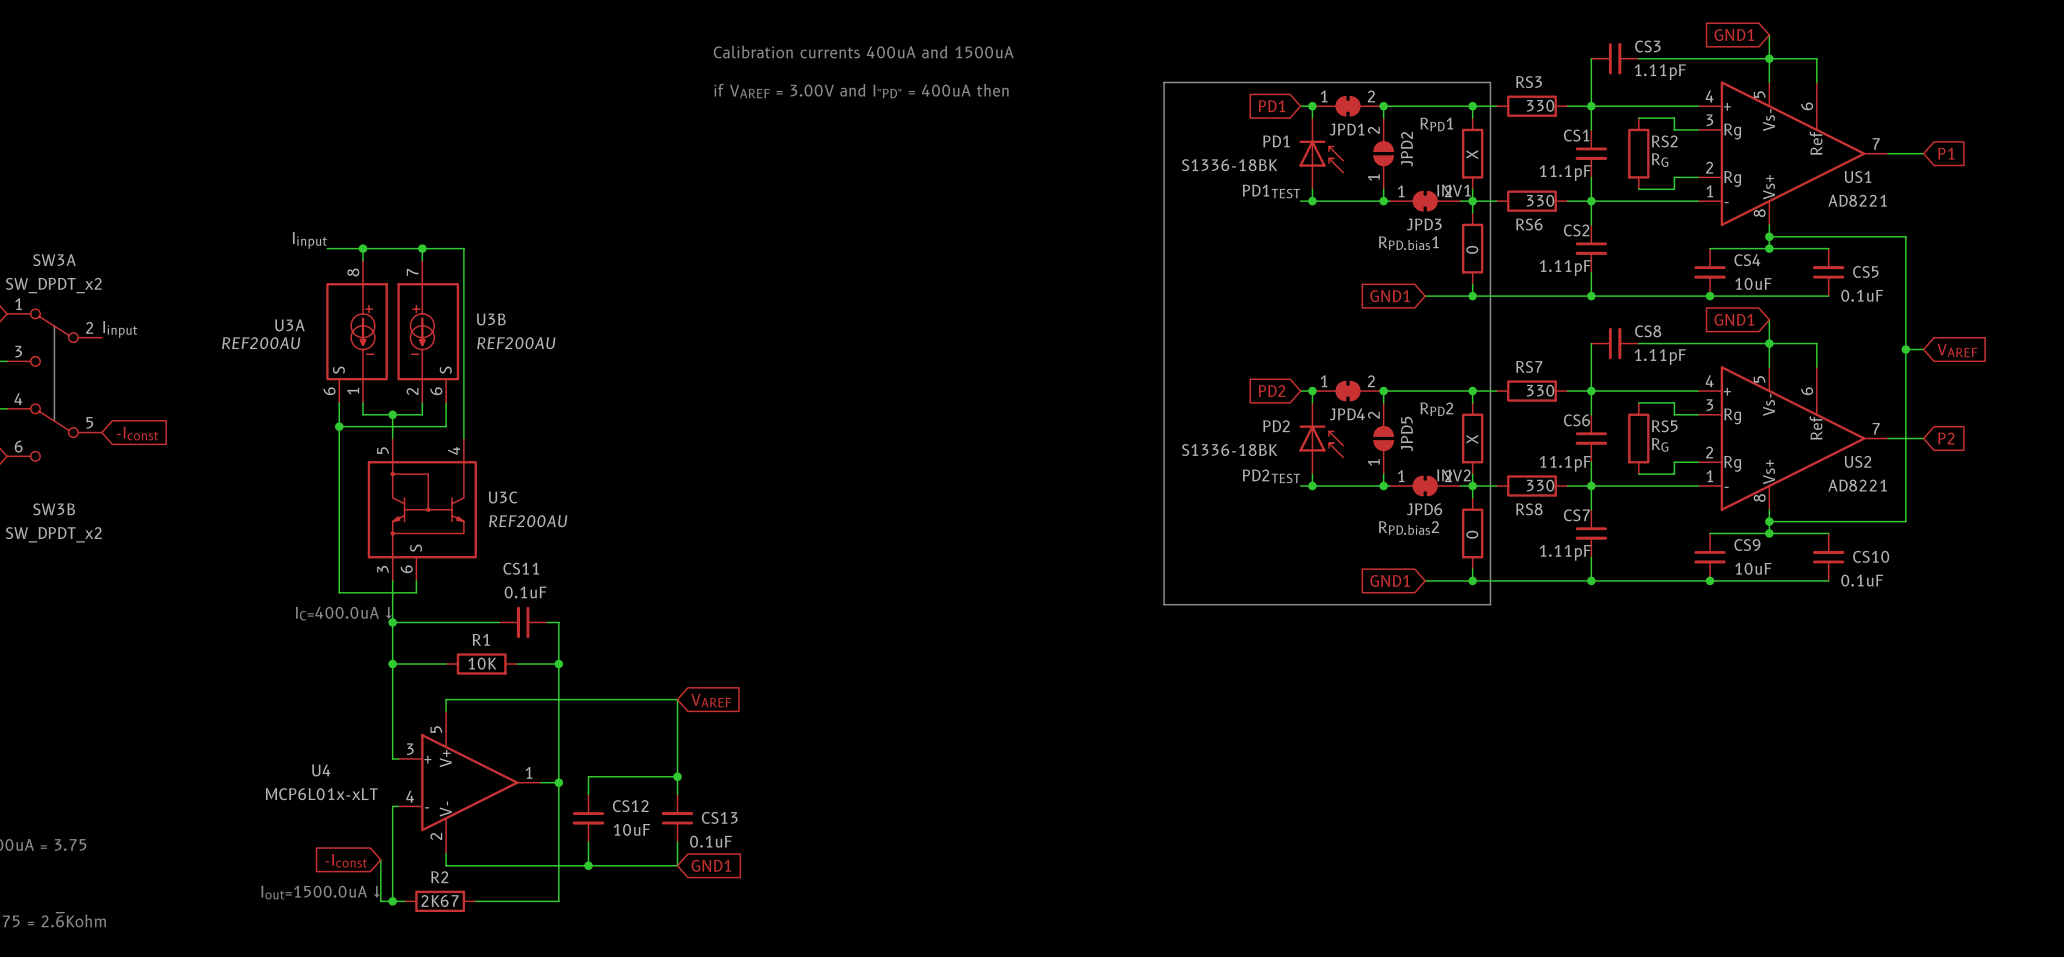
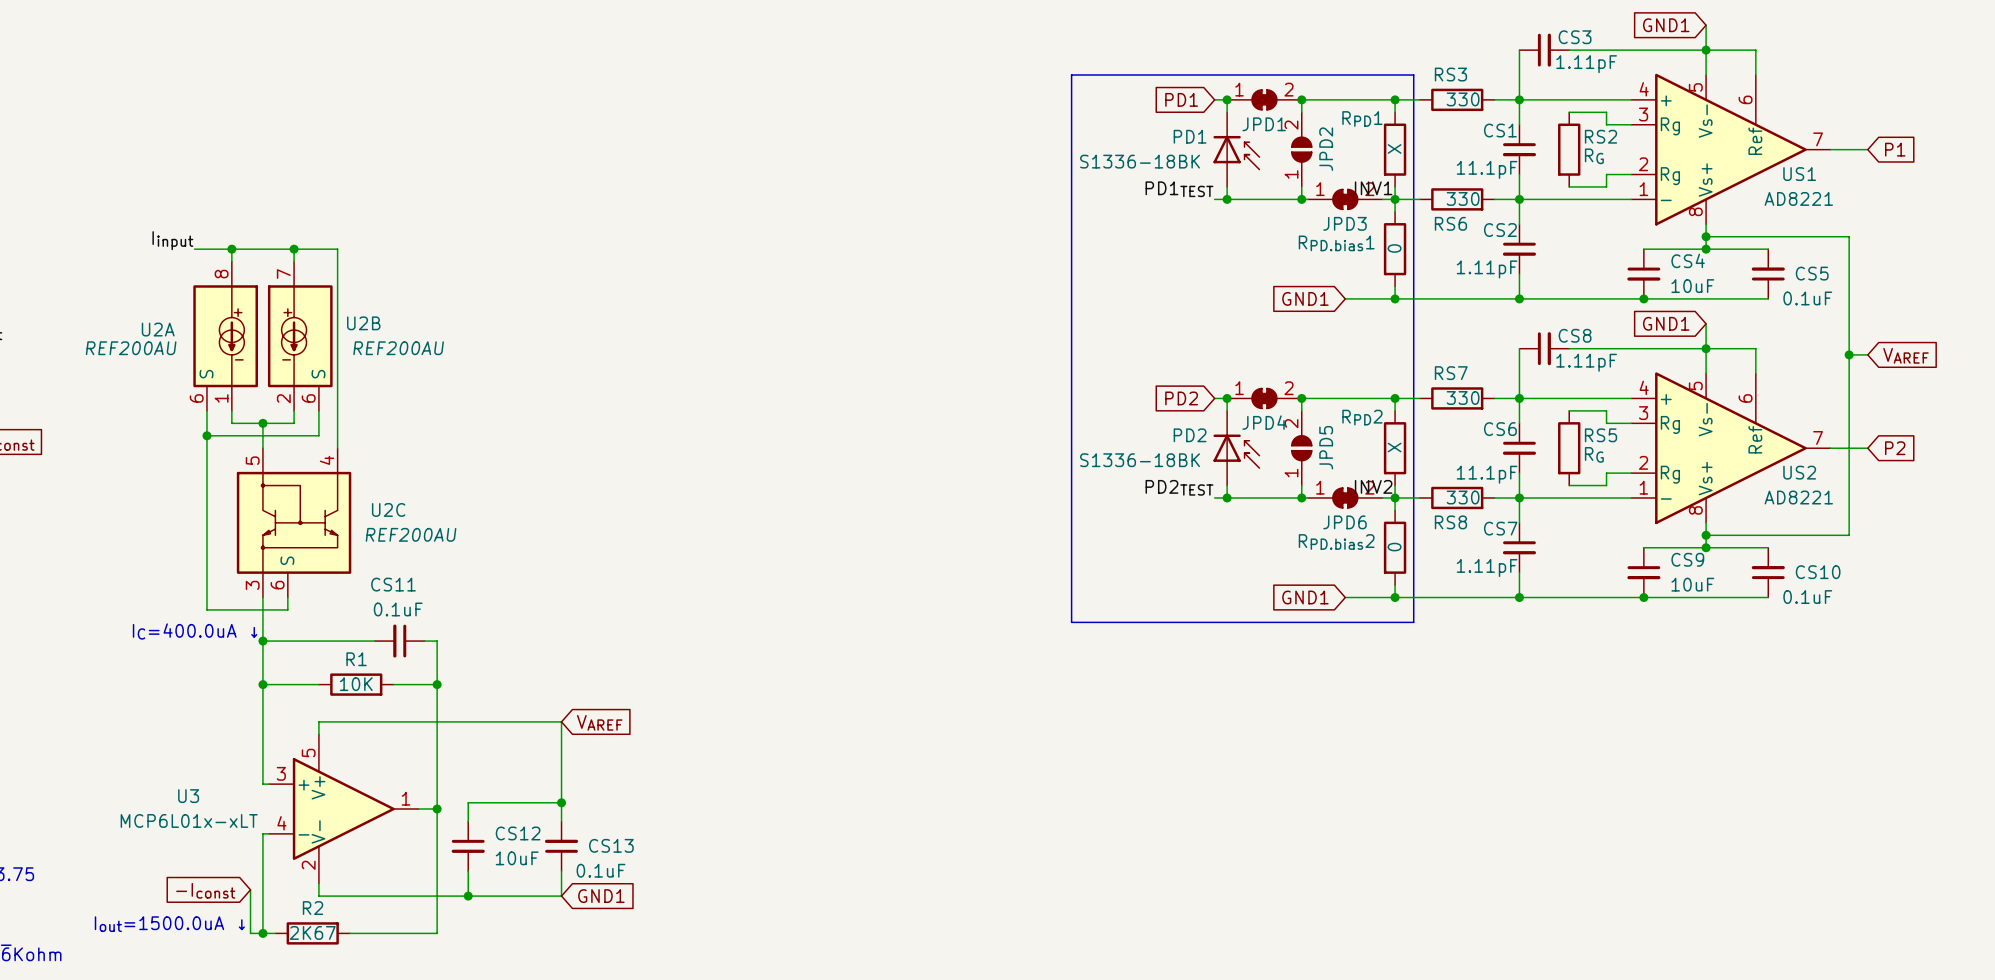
text: Calibration currents 400uA and 1500uA (863, 52) -> none
text: if VAREF = 3.00V and I"PD" = 400uA then (861, 91) -> none
U3B name: U3B (491, 319) -> U2B (363, 323)
U3A name: U3A (289, 325) -> U2A (158, 329)
U3C name: U3C (503, 497) -> U2C (388, 509)
U4 name: U4 (321, 770) -> U3 (188, 796)

